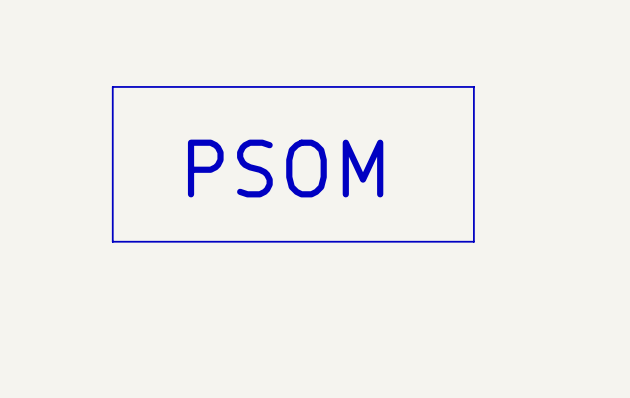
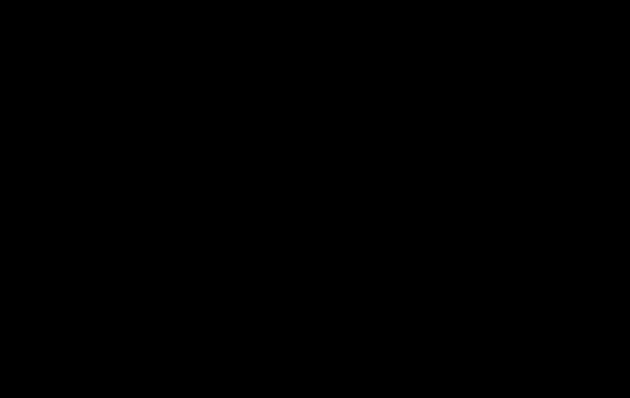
line: (112, 86) (473, 86) (473, 241) (112, 241) (112, 86) -> none
text: PSOM (285, 168) -> none

